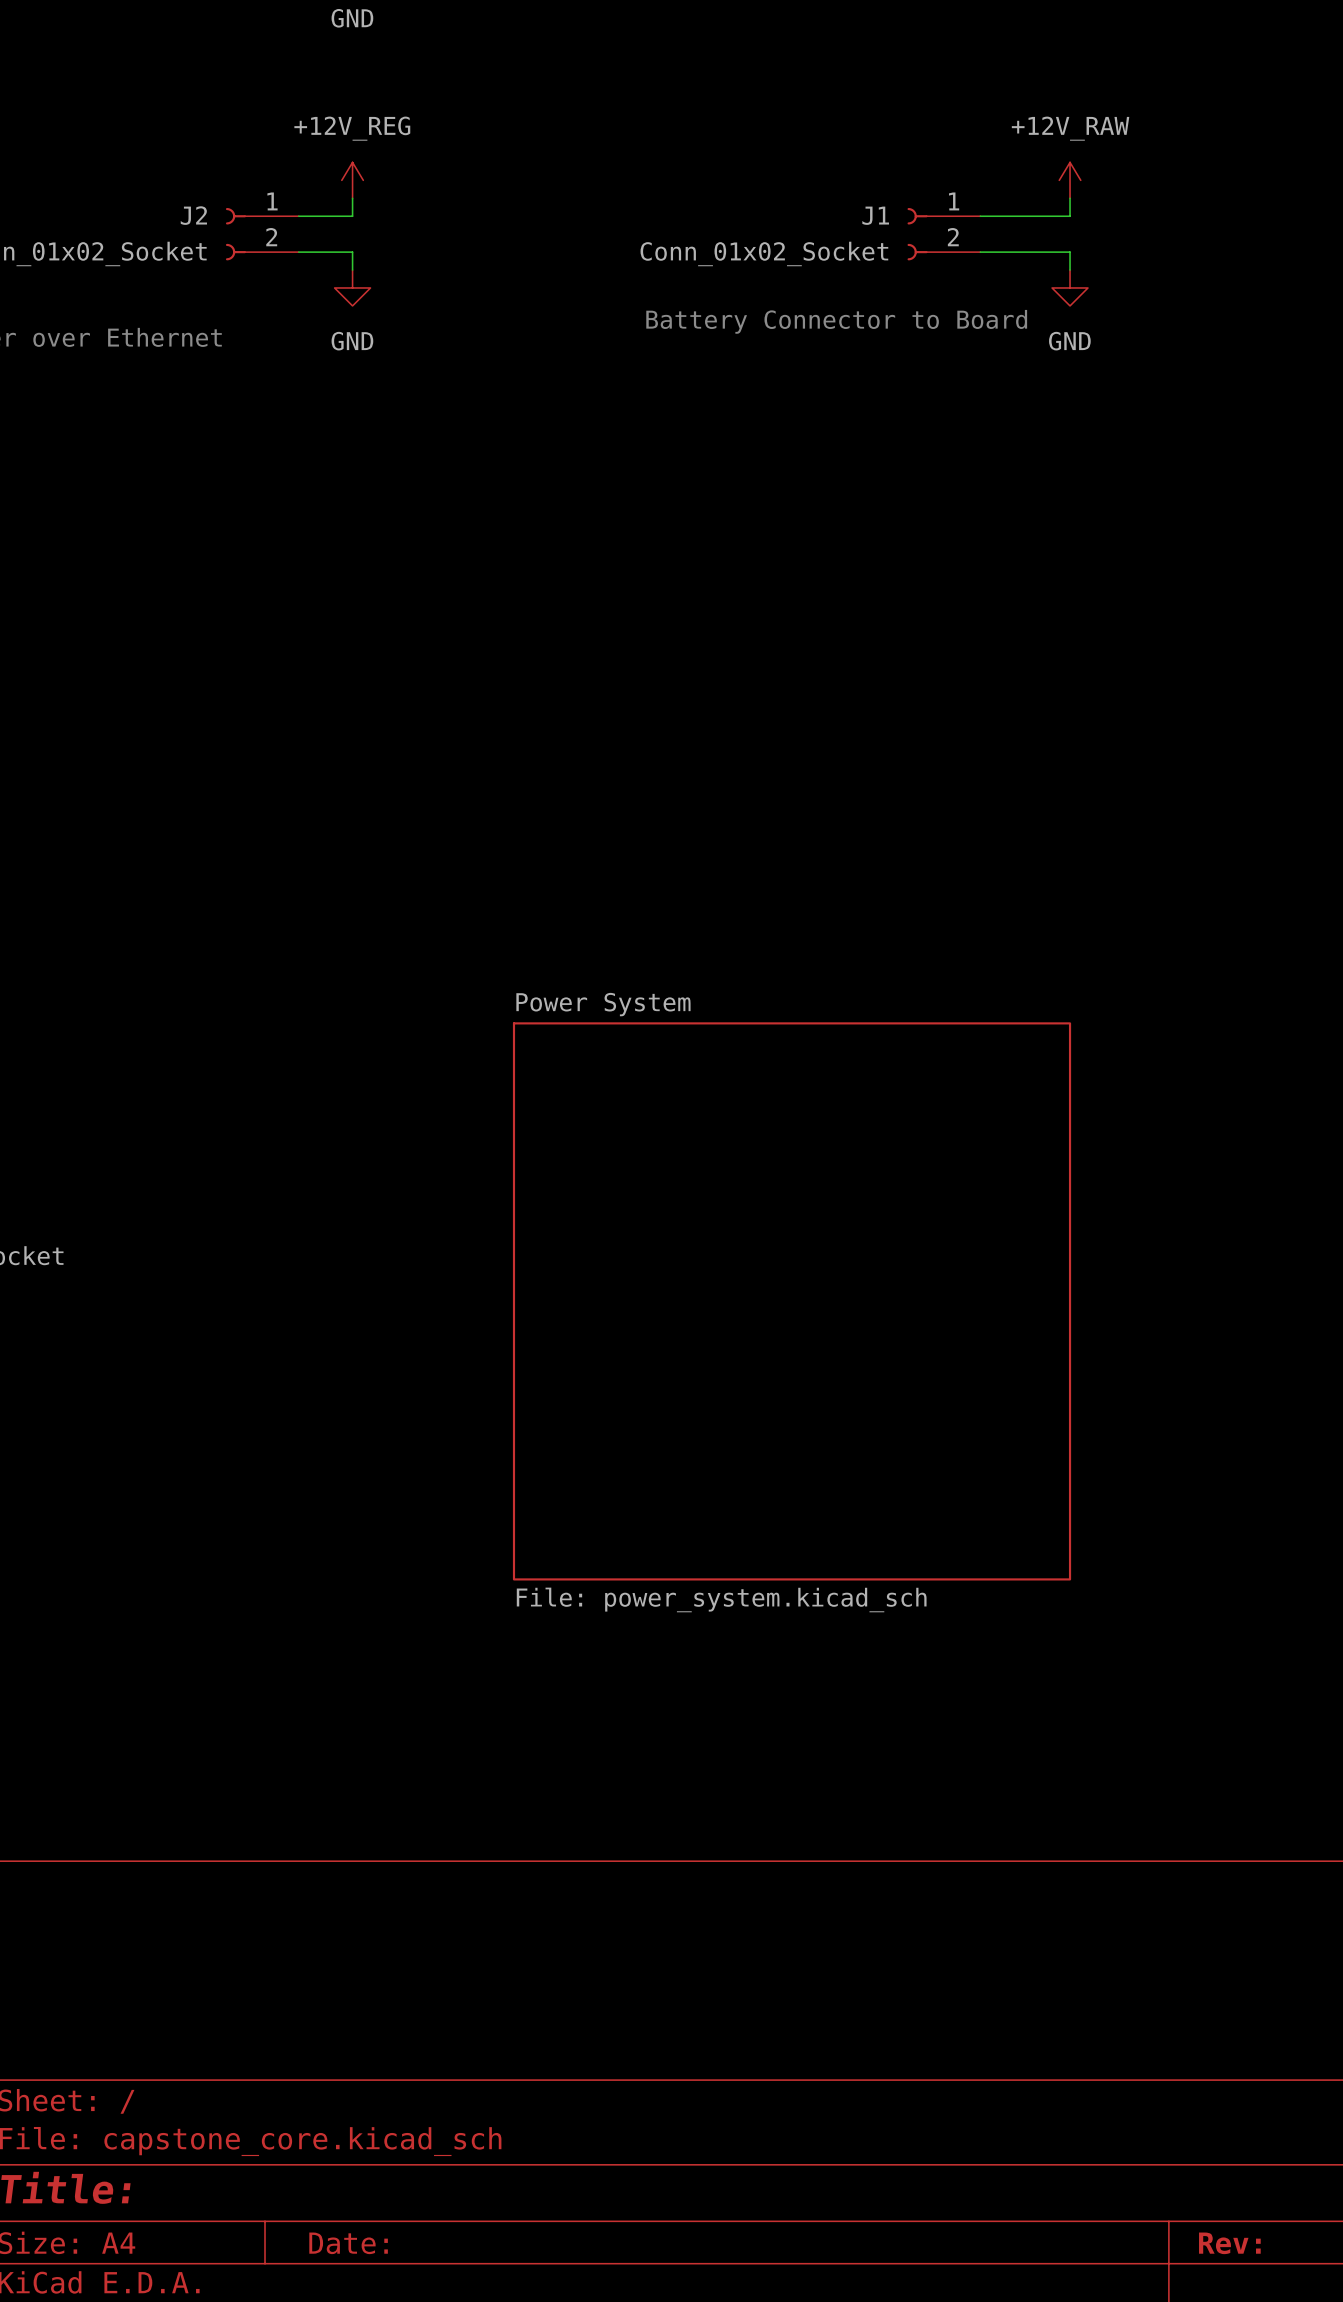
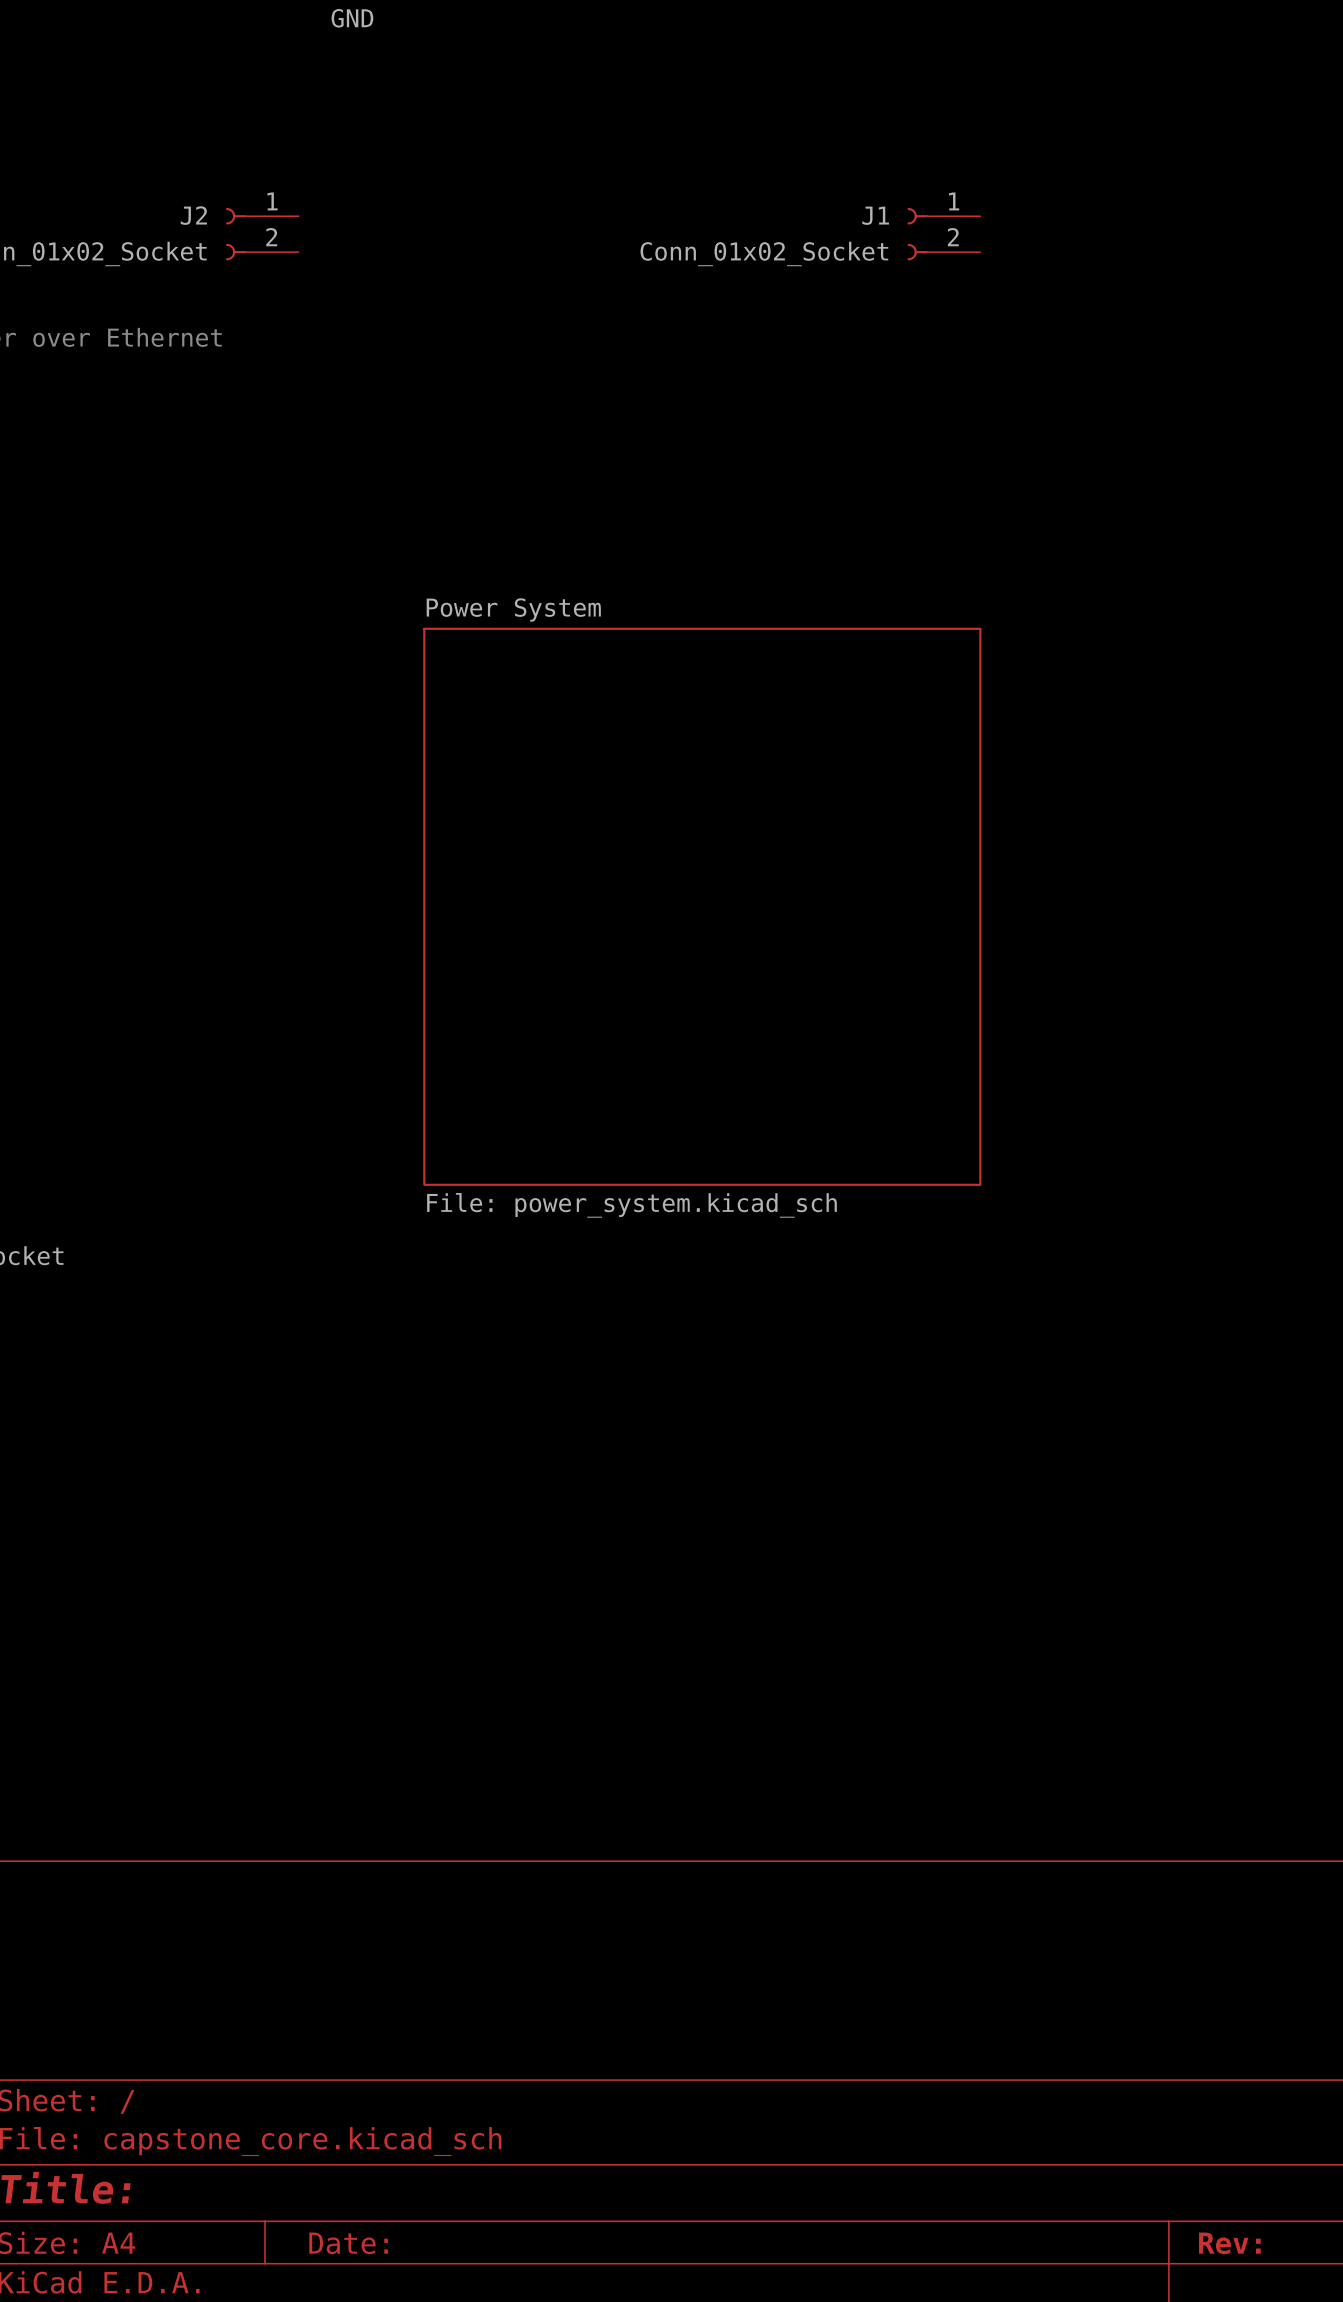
power symbol: +12V_REG (352, 180) -> none
power symbol: +12V_RAW (1070, 180) -> none
wire: (352, 198) (352, 216) (298, 216) -> none
wire: (1070, 198) (1070, 216) (980, 216) -> none
wire: (298, 252) (352, 252) (352, 270) -> none
wire: (980, 252) (1070, 252) (1070, 270) -> none
power symbol: GND (352, 287) -> none
power symbol: GND (1070, 287) -> none
text: Battery Connector to Board (836, 321) -> none
sheet Power System: none -> File: power_system.kicad_sch (702, 906)
sheet Power System: File: power_system.kicad_sch (792, 1301) -> none

